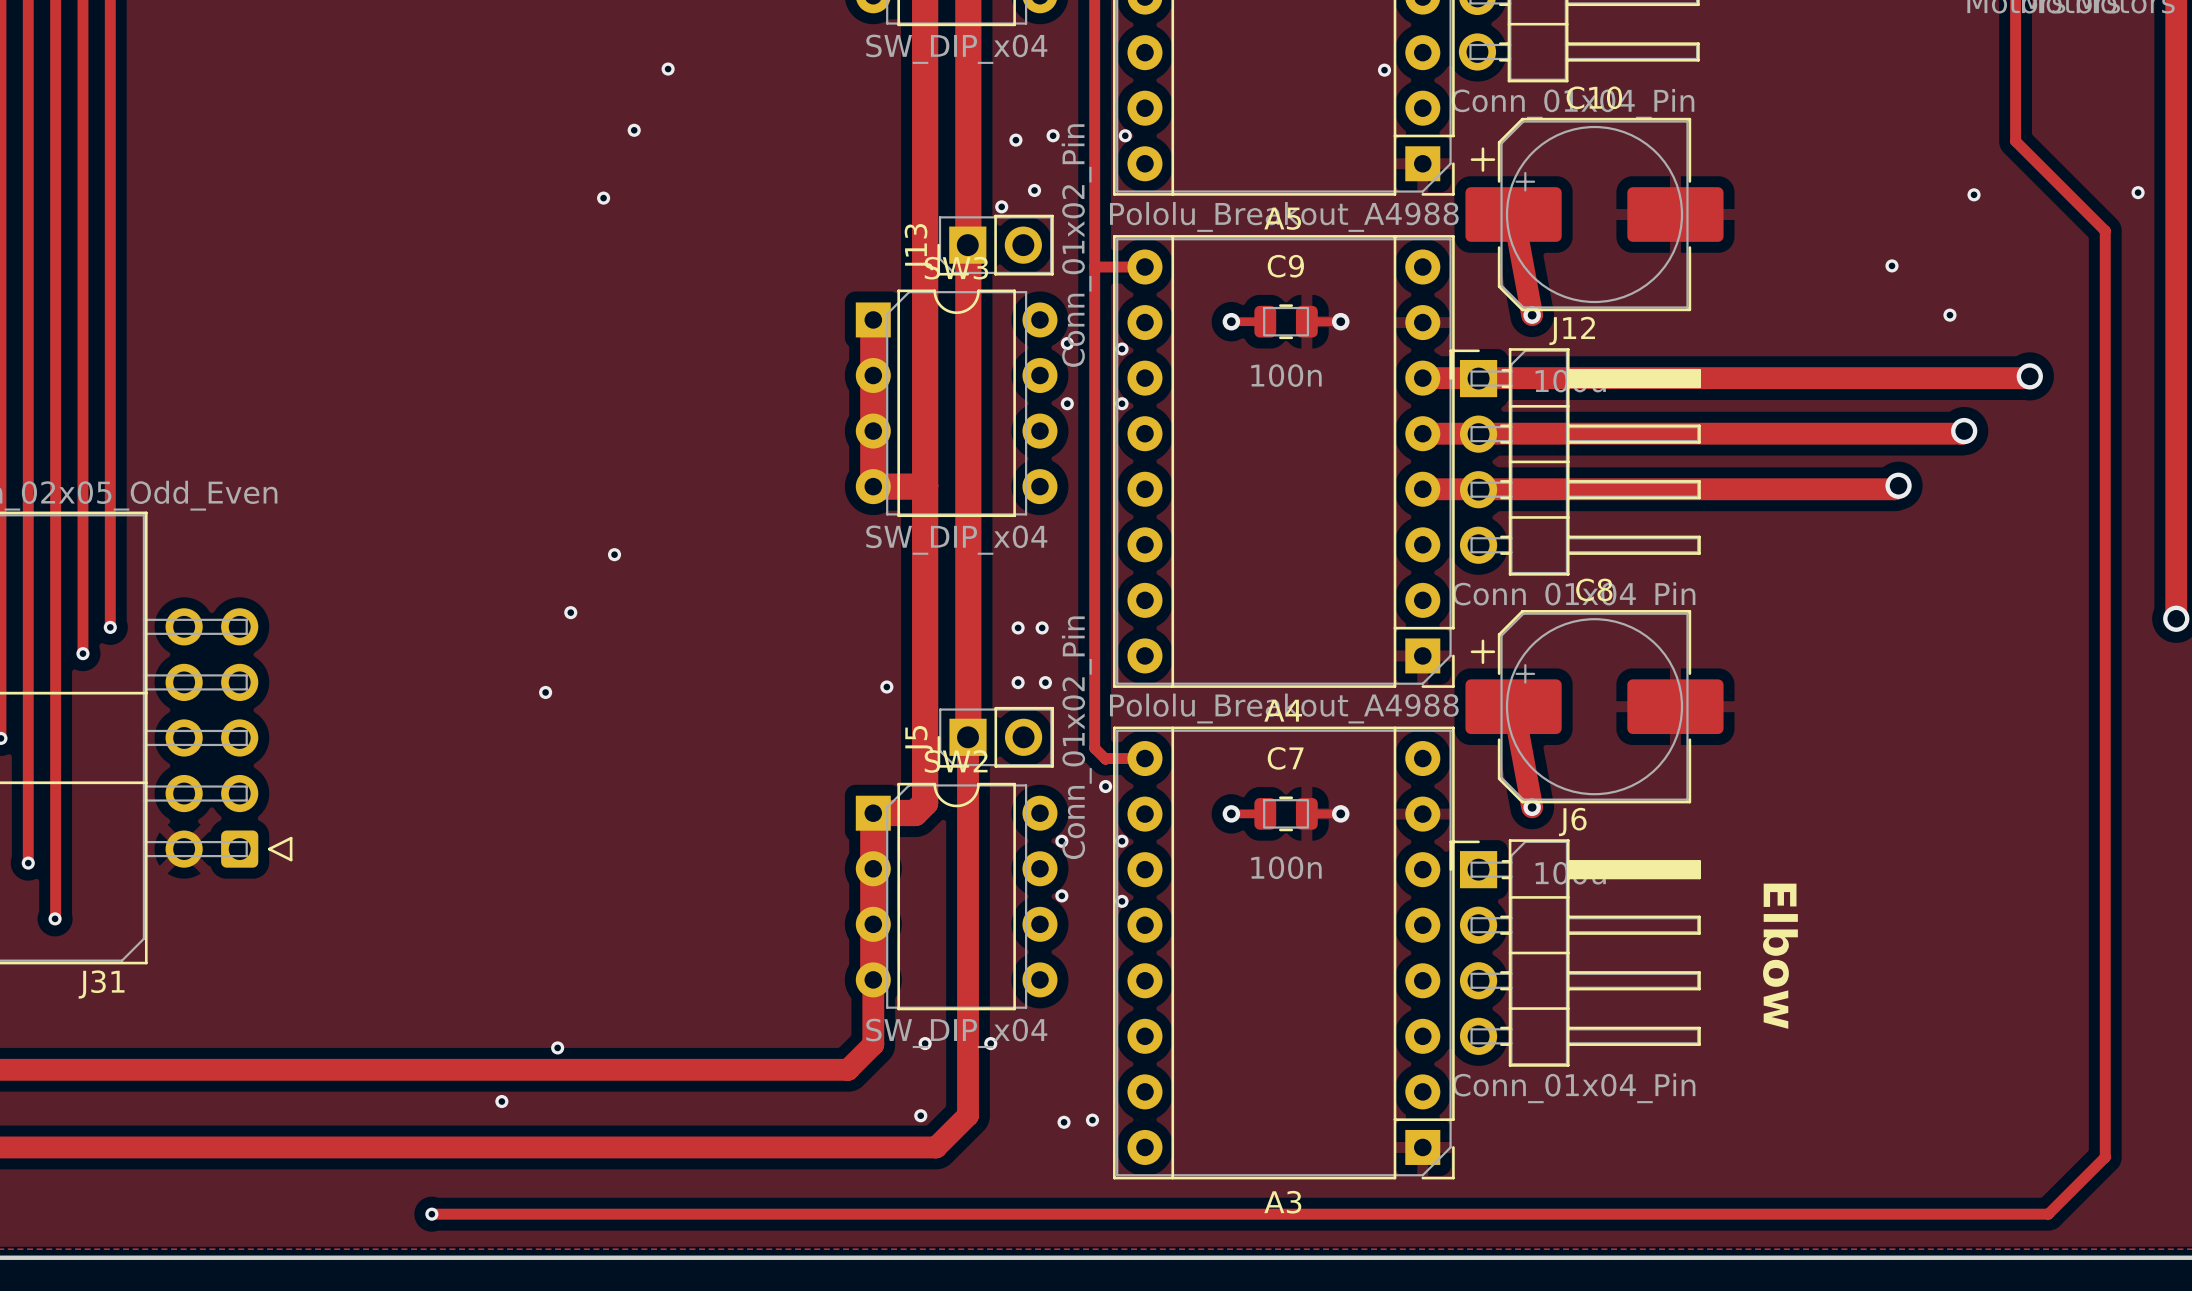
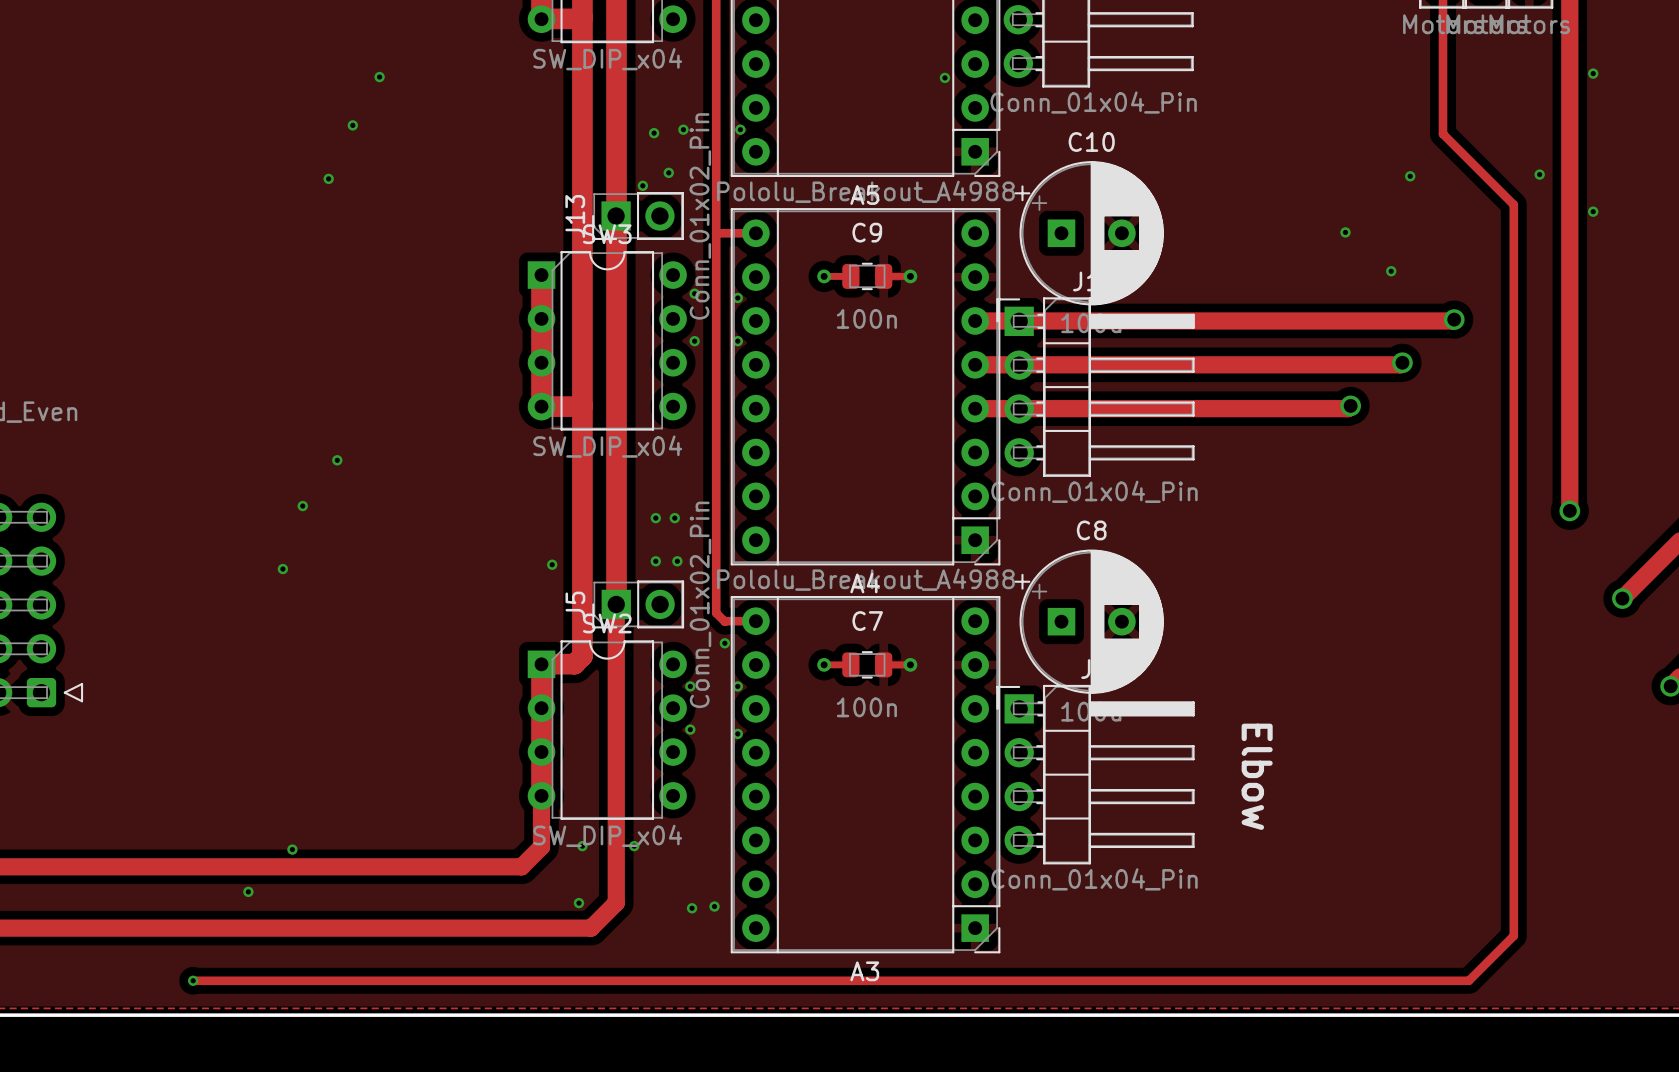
C10 footprint: [1465, 117, 1724, 312] -> [1014, 161, 1164, 306]
track: (1513, 214) (1532, 315) -> none
via: (1532, 315) -> none
C8 footprint: [1465, 610, 1724, 804] -> [1014, 549, 1164, 694]
track: (1513, 706) (1532, 807) -> none
via: (1532, 807) -> none

